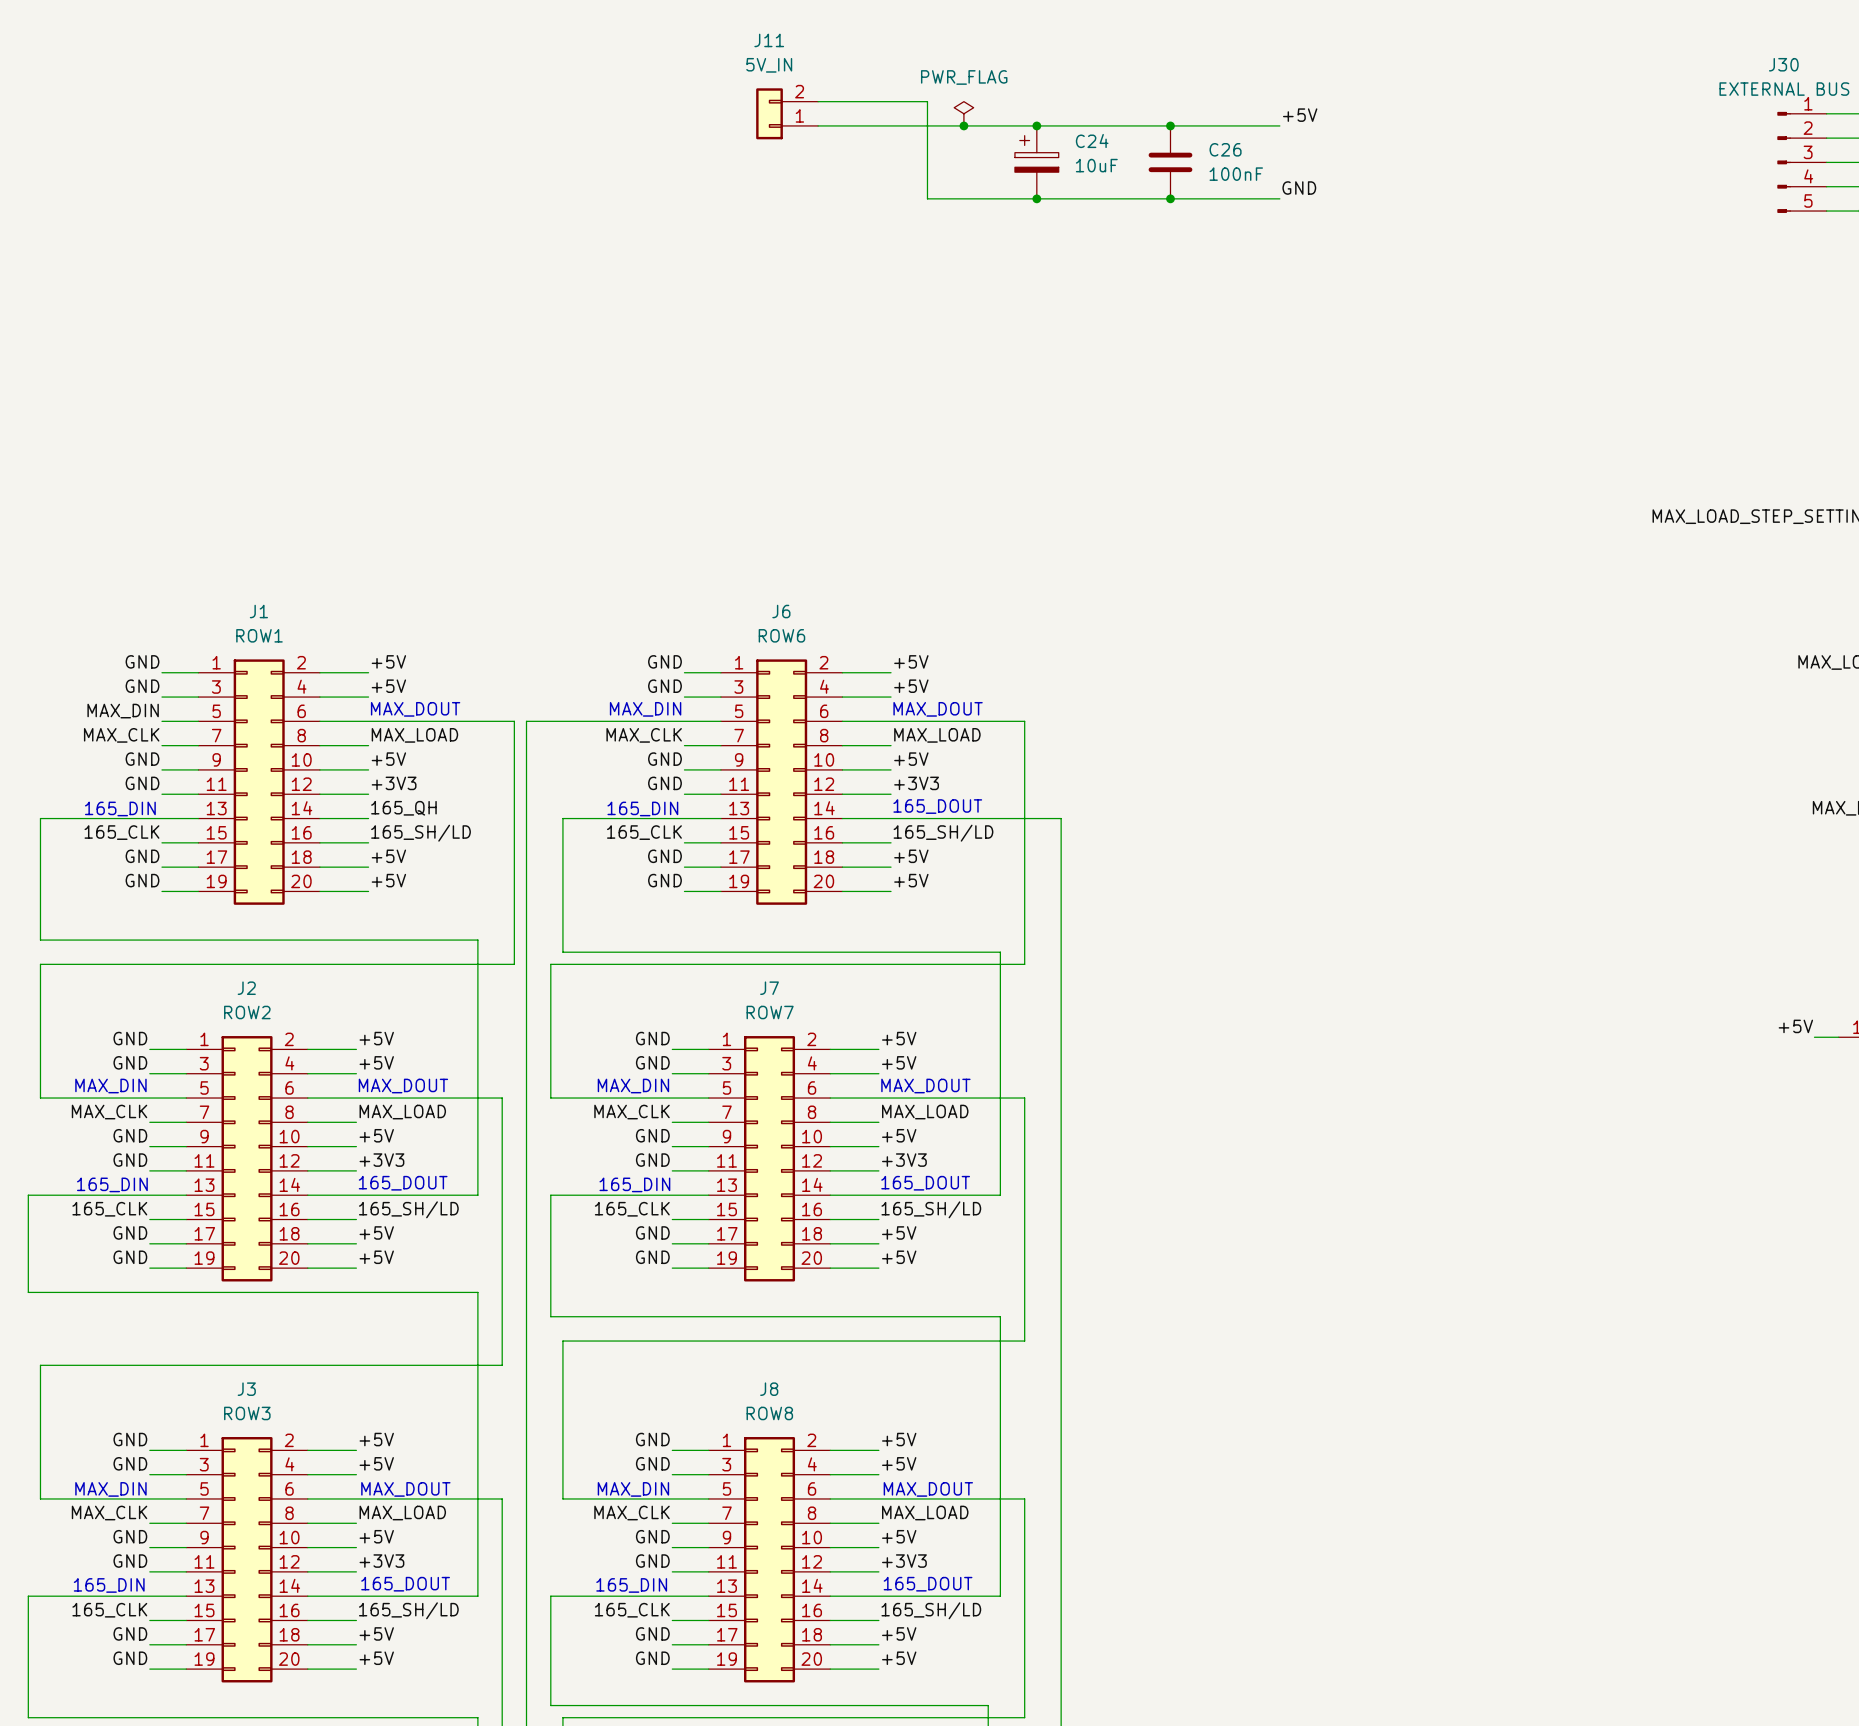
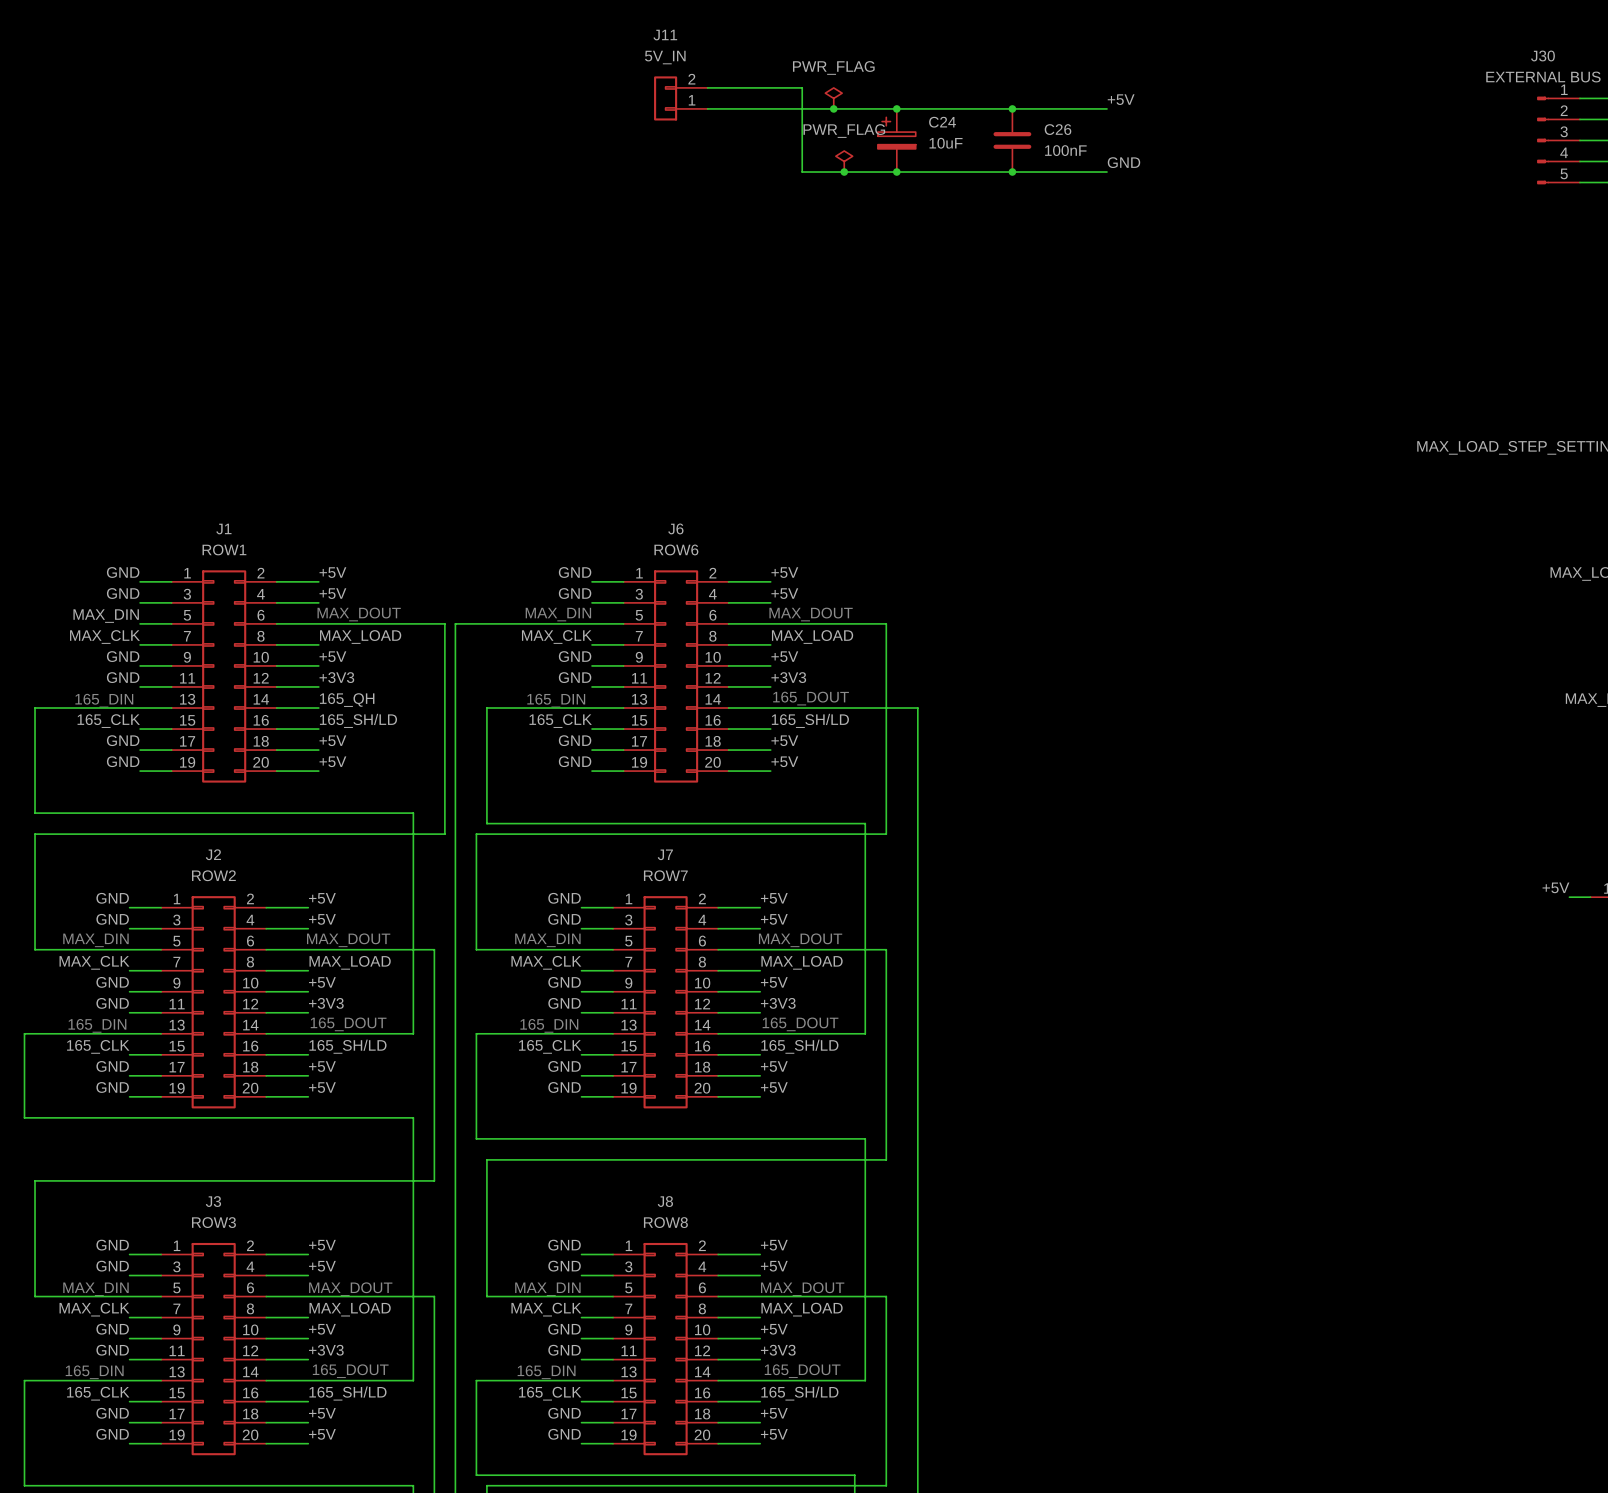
power symbol: none -> PWR_FLAG (844, 161)
junction: none -> (844, 172)

